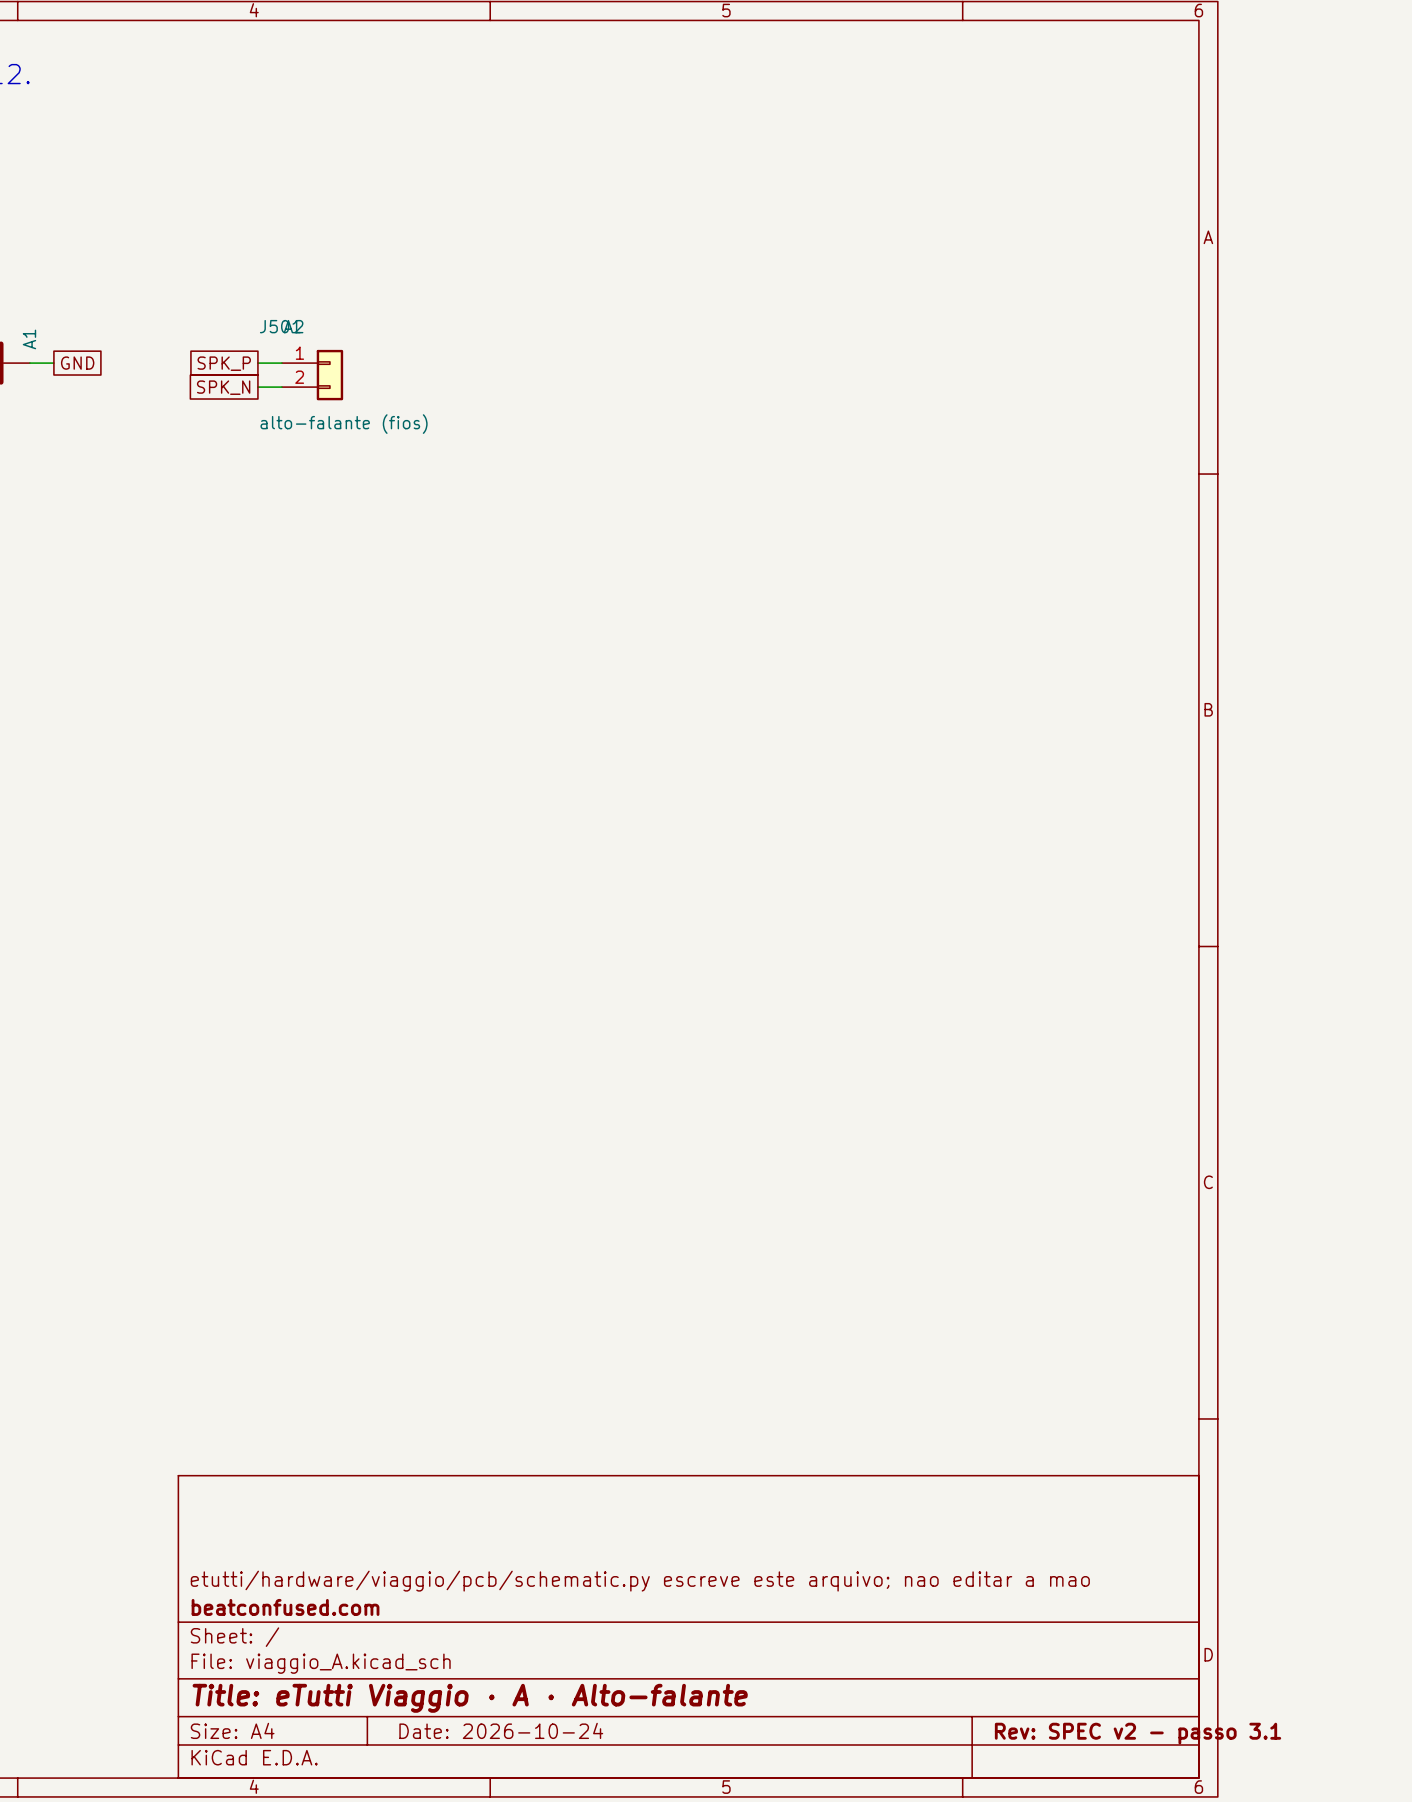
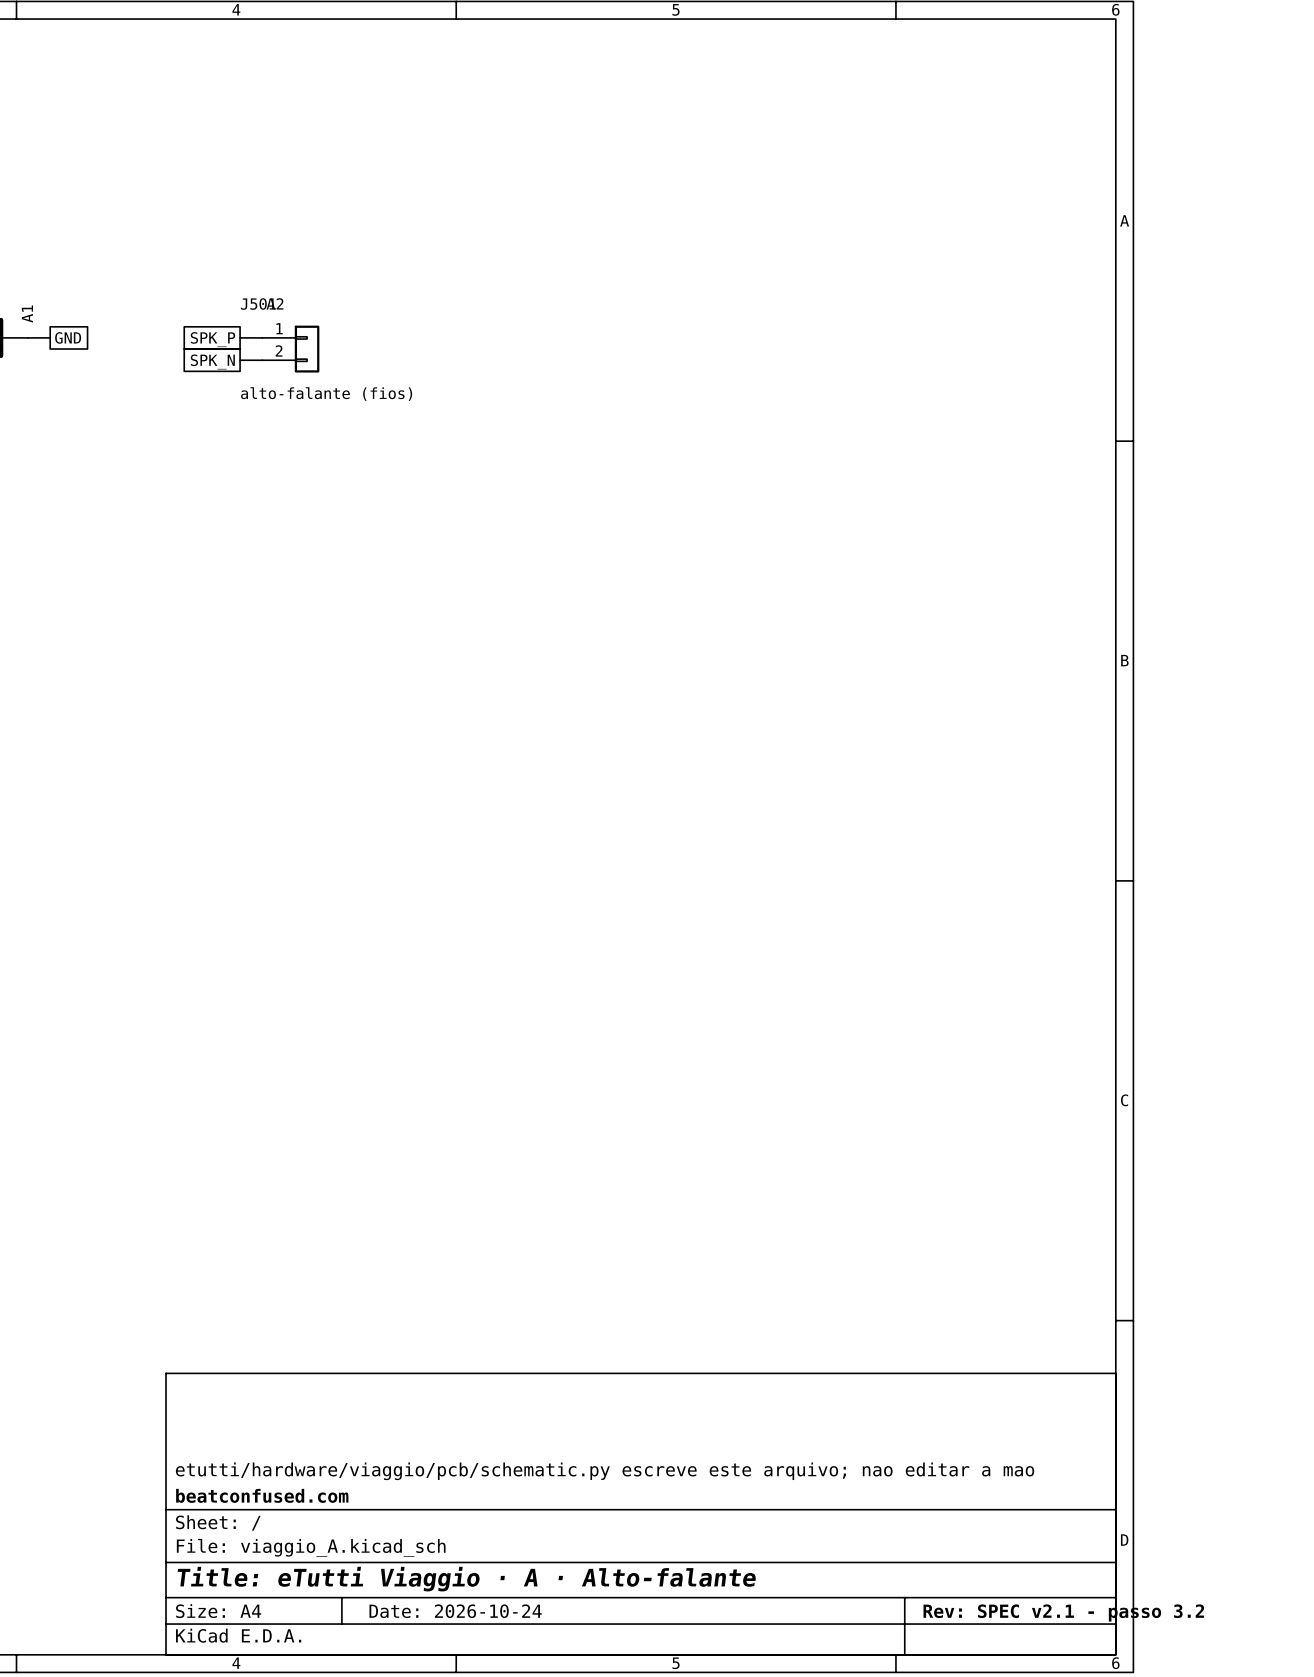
title block: Rev: SPEC v2 - passo 3.1 (1138, 1733) -> Rev: SPEC v2.1 - passo 3.2 (1063, 1612)

